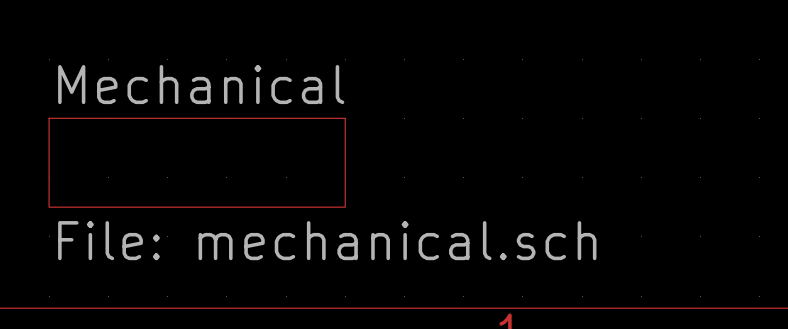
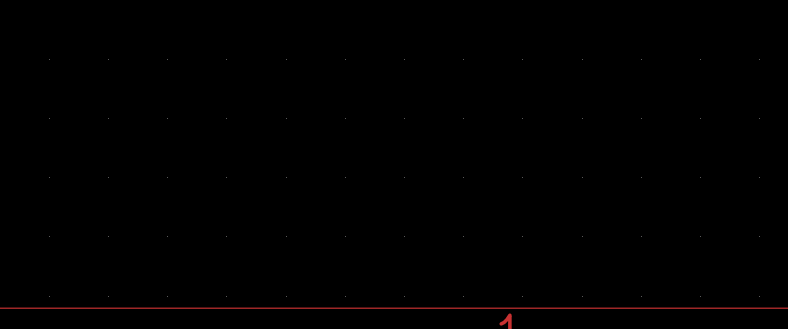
sheet Mechanical: File: mechanical.sch (197, 162) -> none

